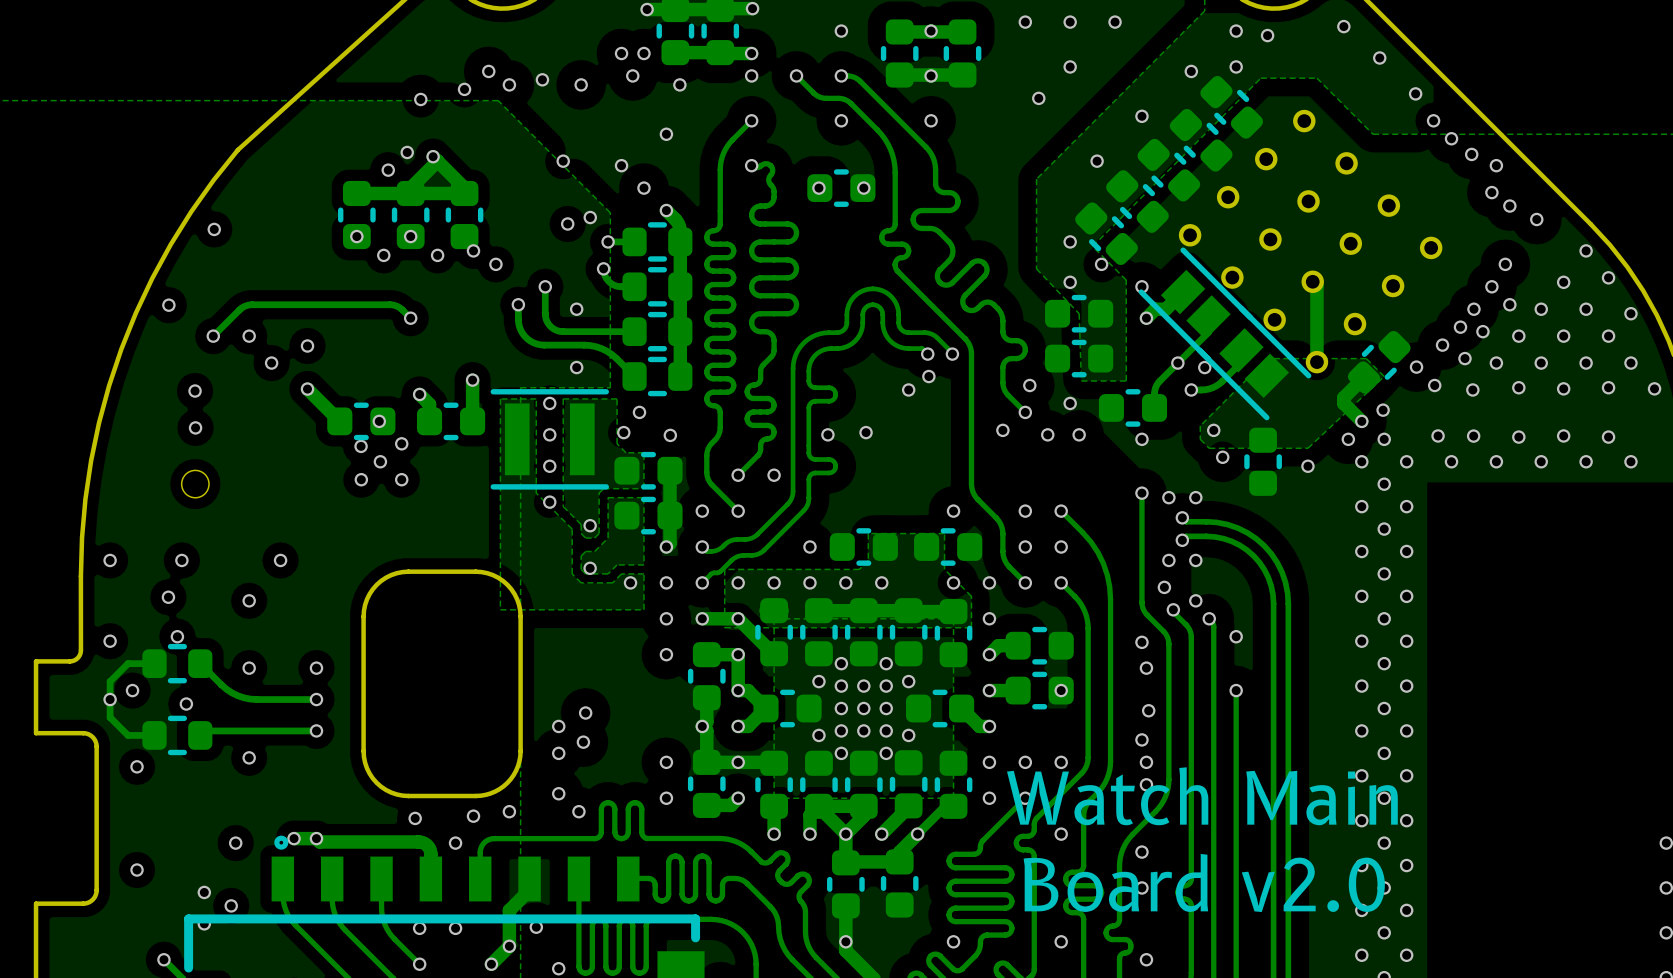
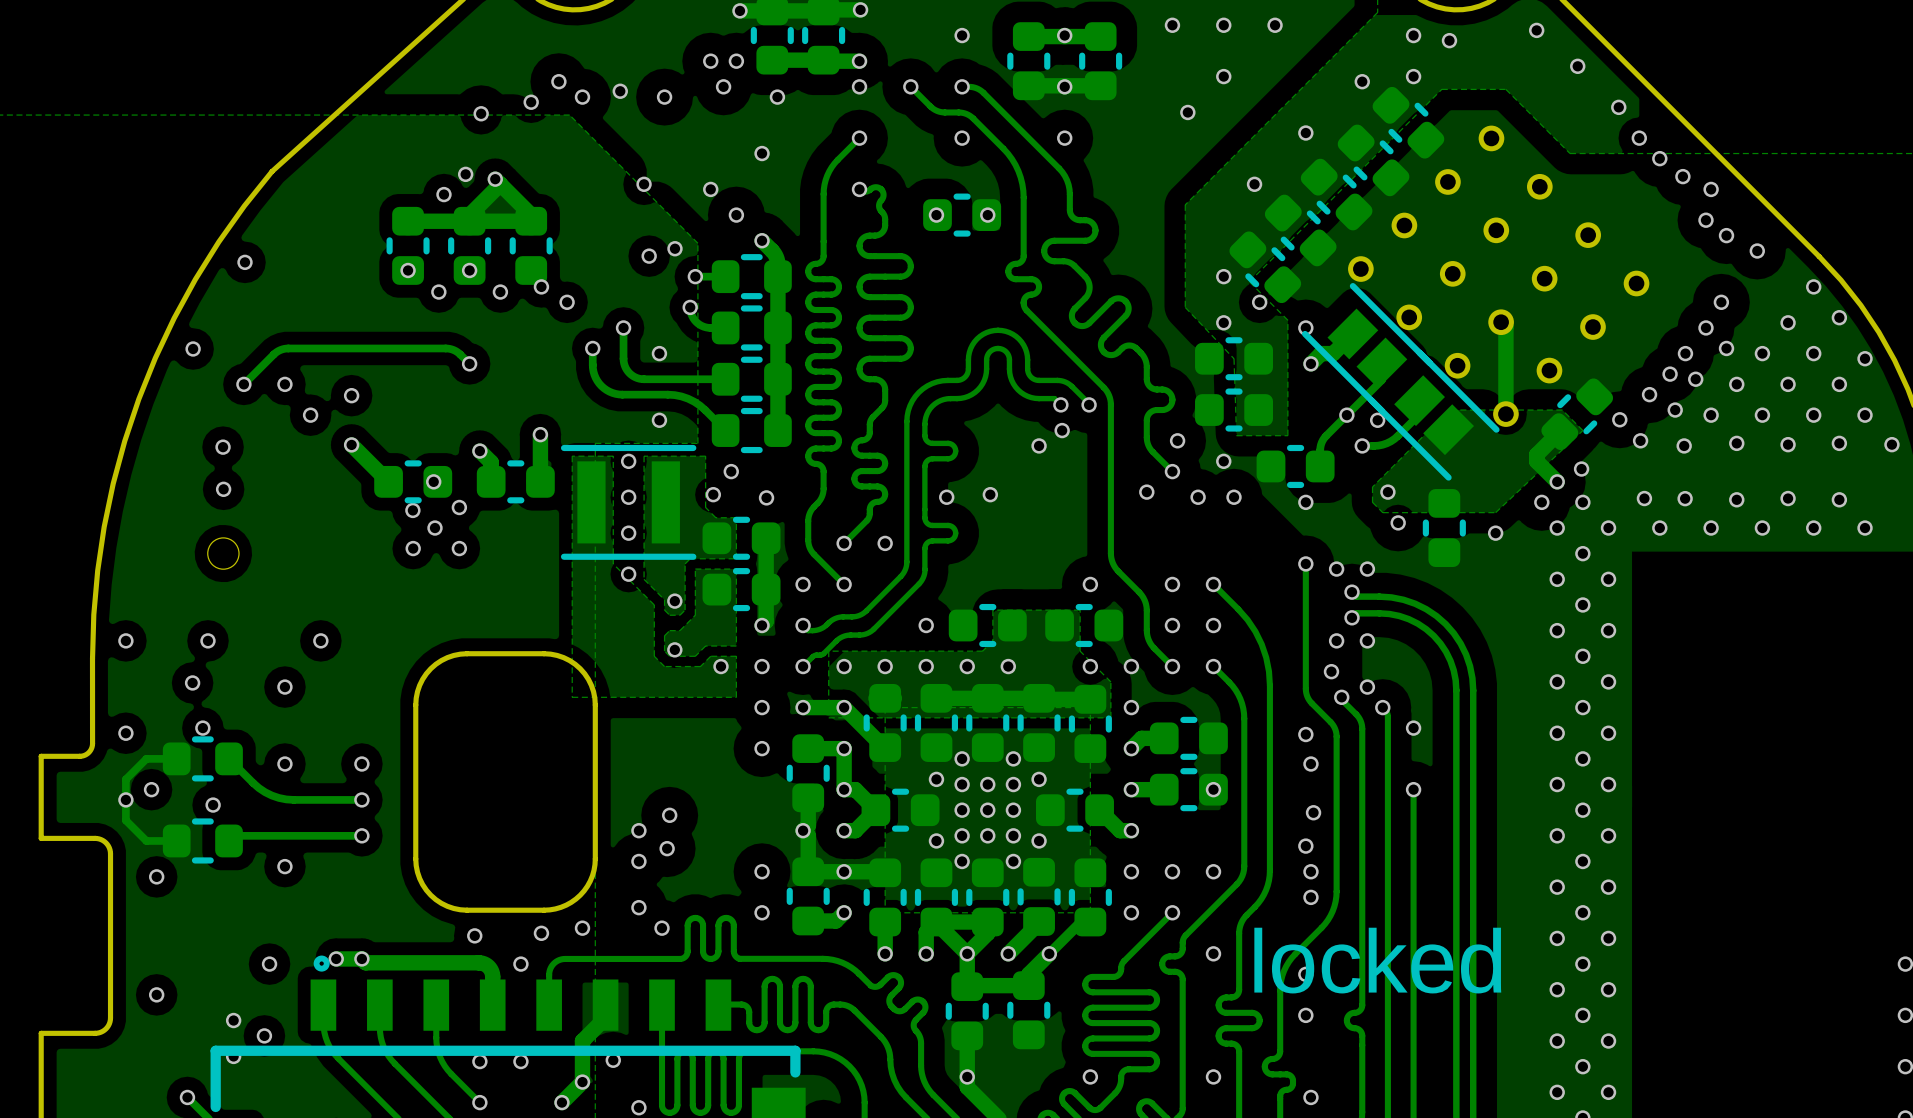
text: Watch Main (1202, 796) -> none
text: none -> locked (1377, 960)
text: Board v2.0 (1204, 883) -> none

